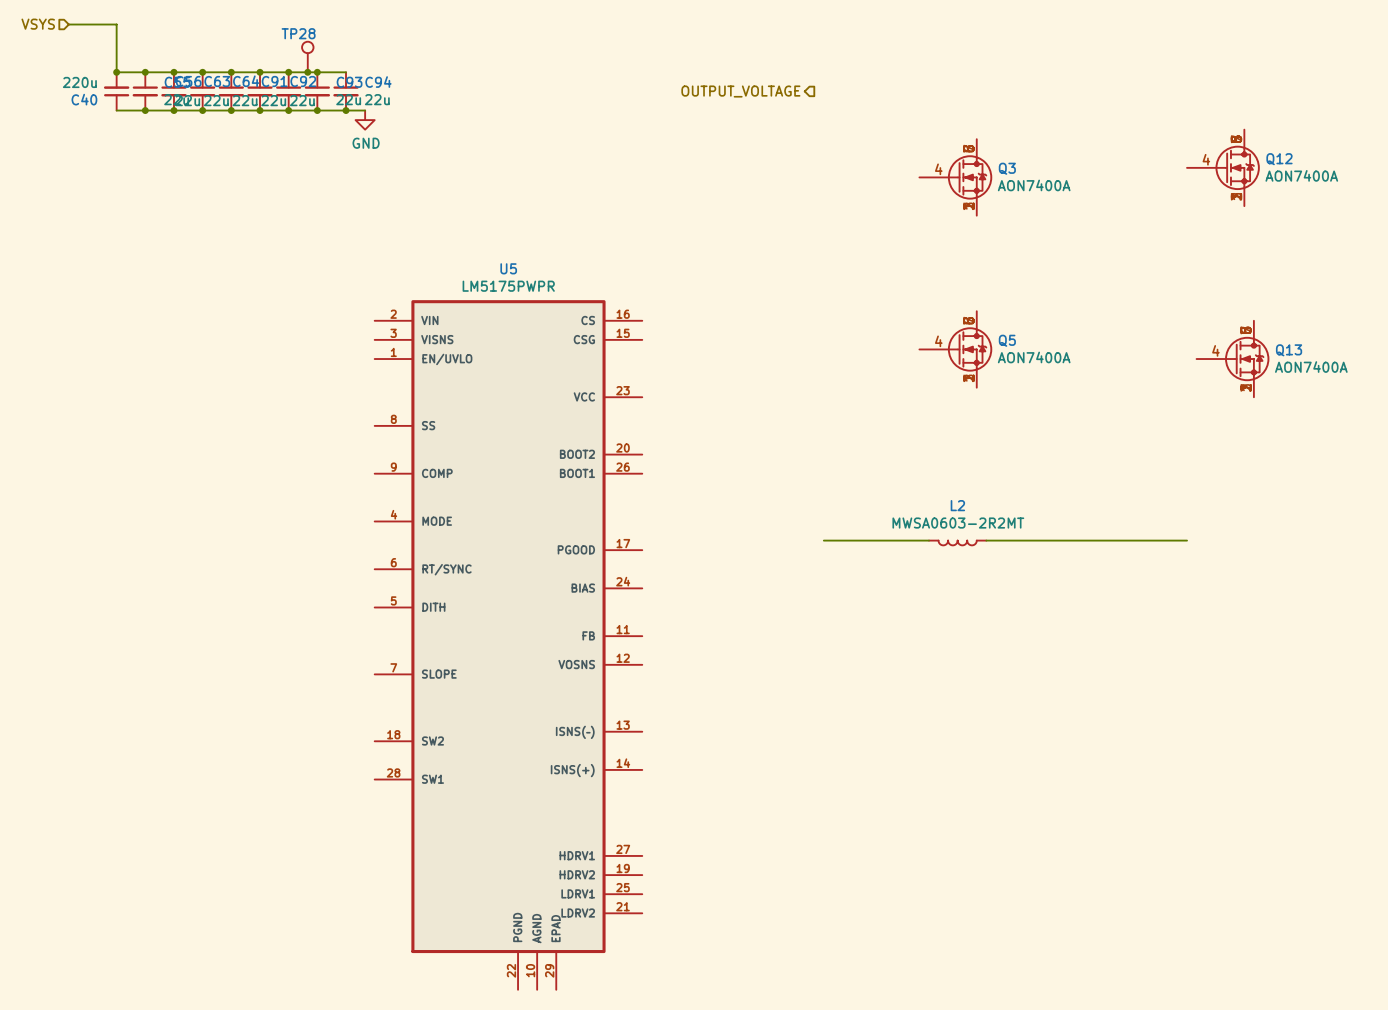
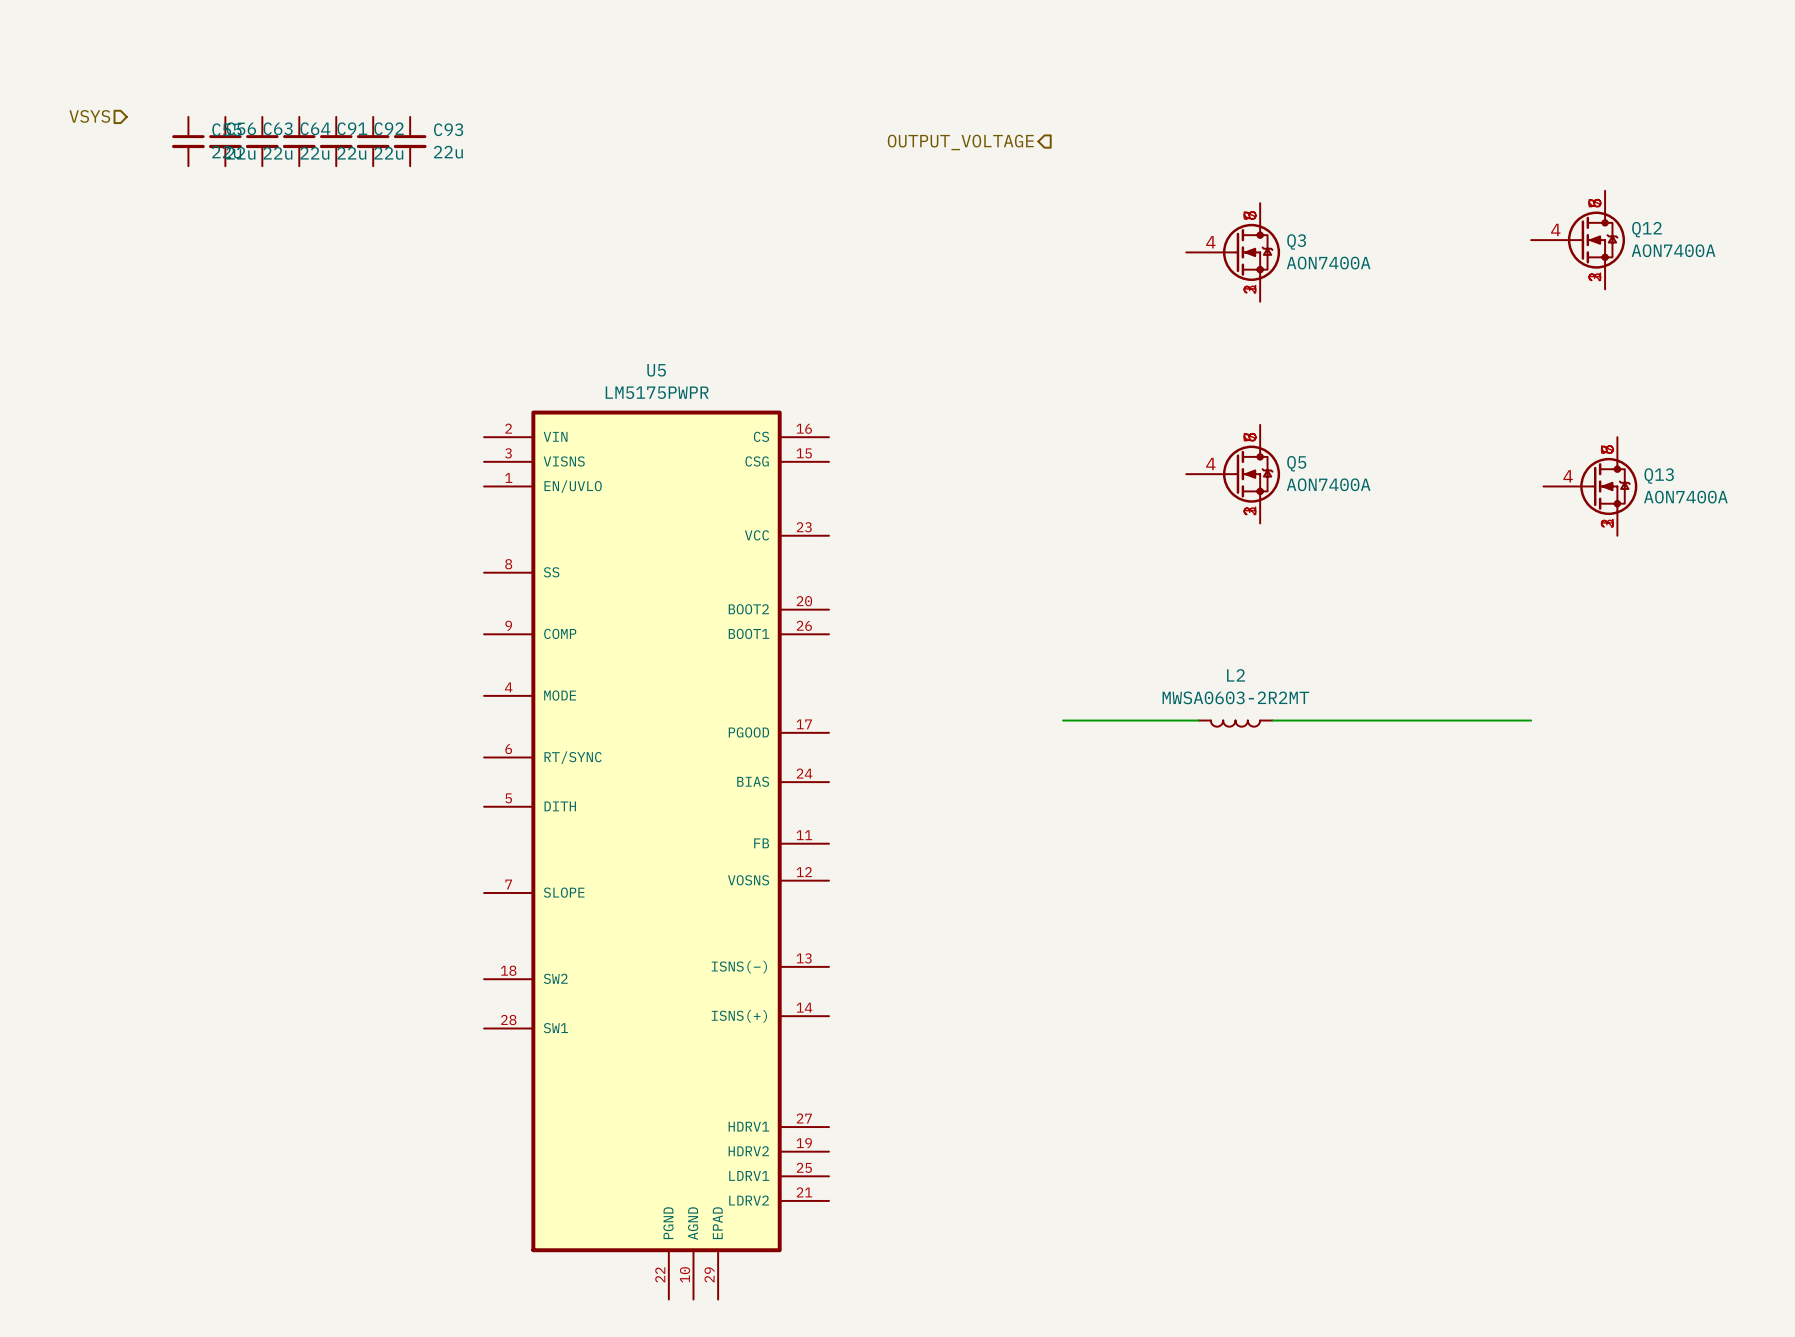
hierarchical label position: VSYS (38, 24) -> VSYS (89, 116)
wire: (68, 24) (116, 24) (116, 72) (346, 72) -> none
TP28: (307, 57) -> none
junction: (116, 72) -> none
junction: (145, 72) -> none
junction: (173, 72) -> none
junction: (202, 72) -> none
junction: (231, 72) -> none
junction: (260, 72) -> none
junction: (288, 72) -> none
junction: (307, 72) -> none
junction: (317, 72) -> none
C40: 220u (116, 91) -> none
C94: 22u (346, 91) -> none
wire: (116, 110) (365, 110) -> none
junction: (145, 110) -> none
junction: (173, 110) -> none
junction: (202, 110) -> none
junction: (231, 110) -> none
junction: (260, 110) -> none
junction: (288, 110) -> none
junction: (317, 110) -> none
junction: (346, 110) -> none
power symbol: GND (365, 120) -> none

